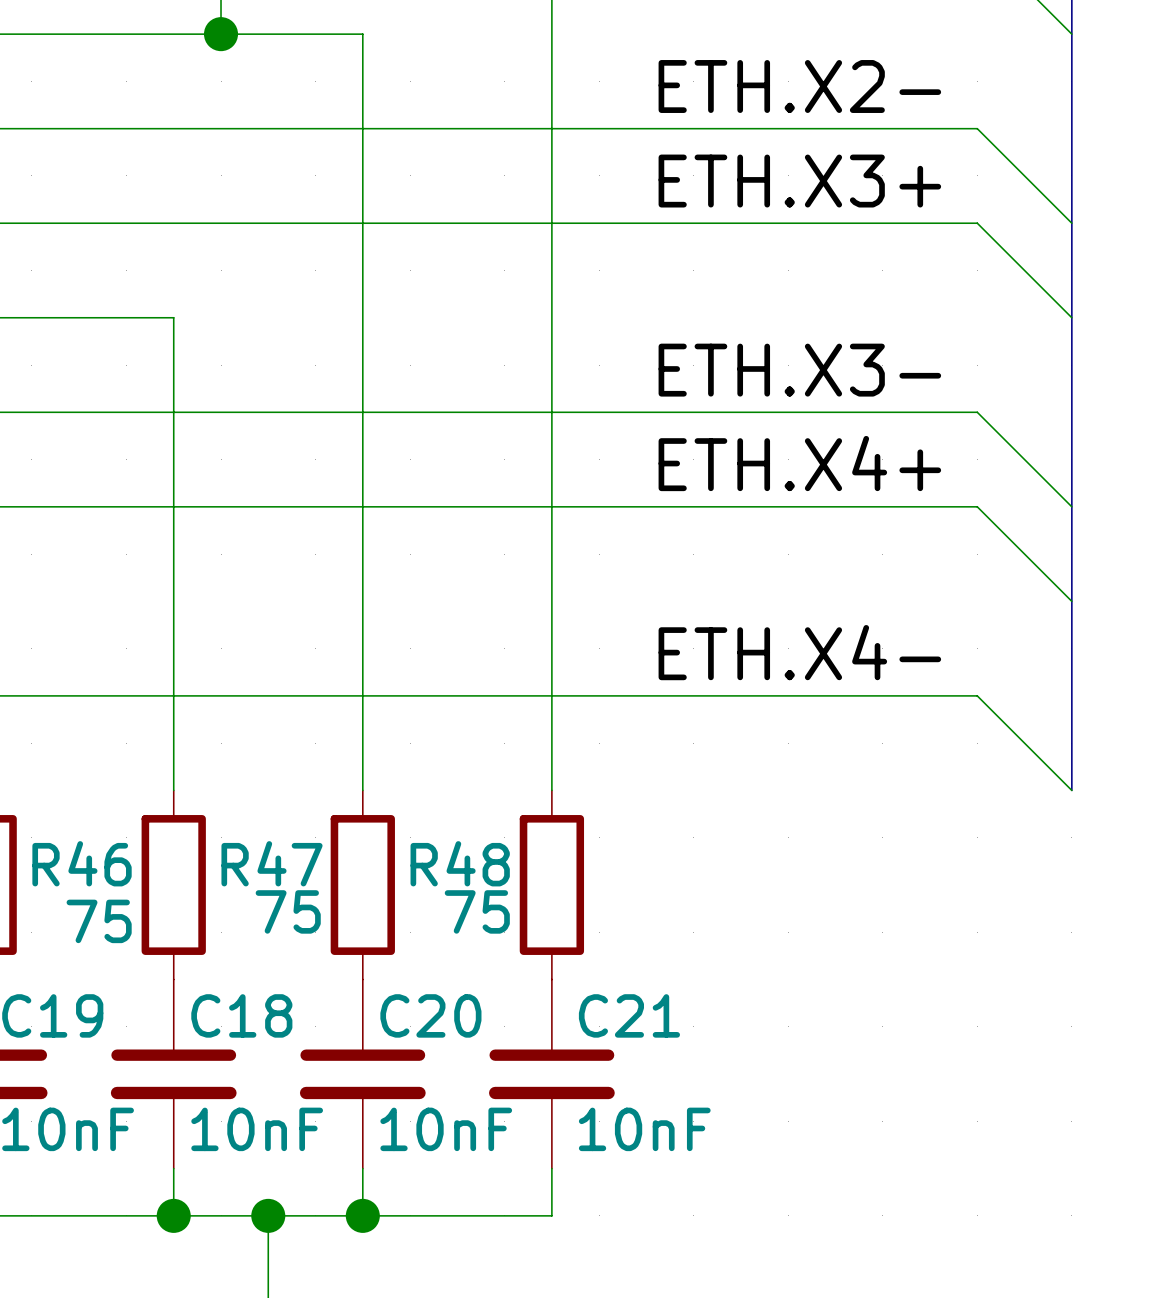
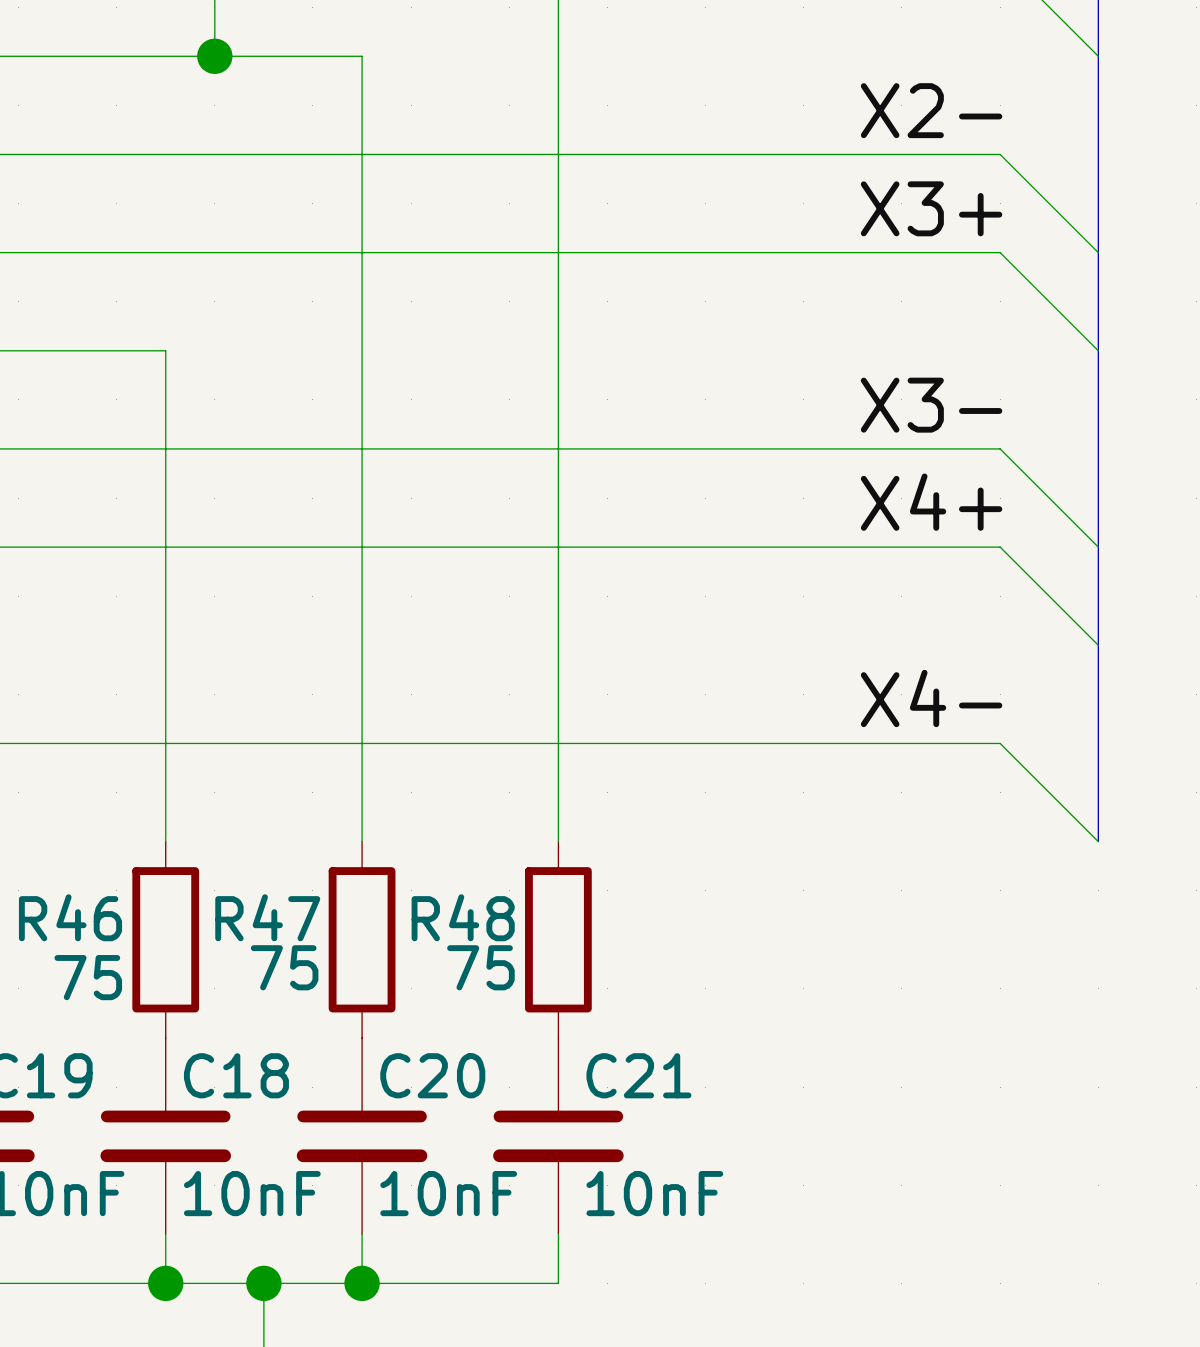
label: ETH.X2- (799, 86) -> none
label: none -> X2- (931, 110)
label: ETH.X3+ (799, 181) -> none
label: none -> X3+ (931, 208)
label: ETH.X3- (799, 370) -> none
label: none -> X3- (931, 405)
label: ETH.X4+ (799, 463) -> none
label: none -> X4+ (931, 502)
label: ETH.X4- (799, 652) -> none
label: none -> X4- (931, 698)

